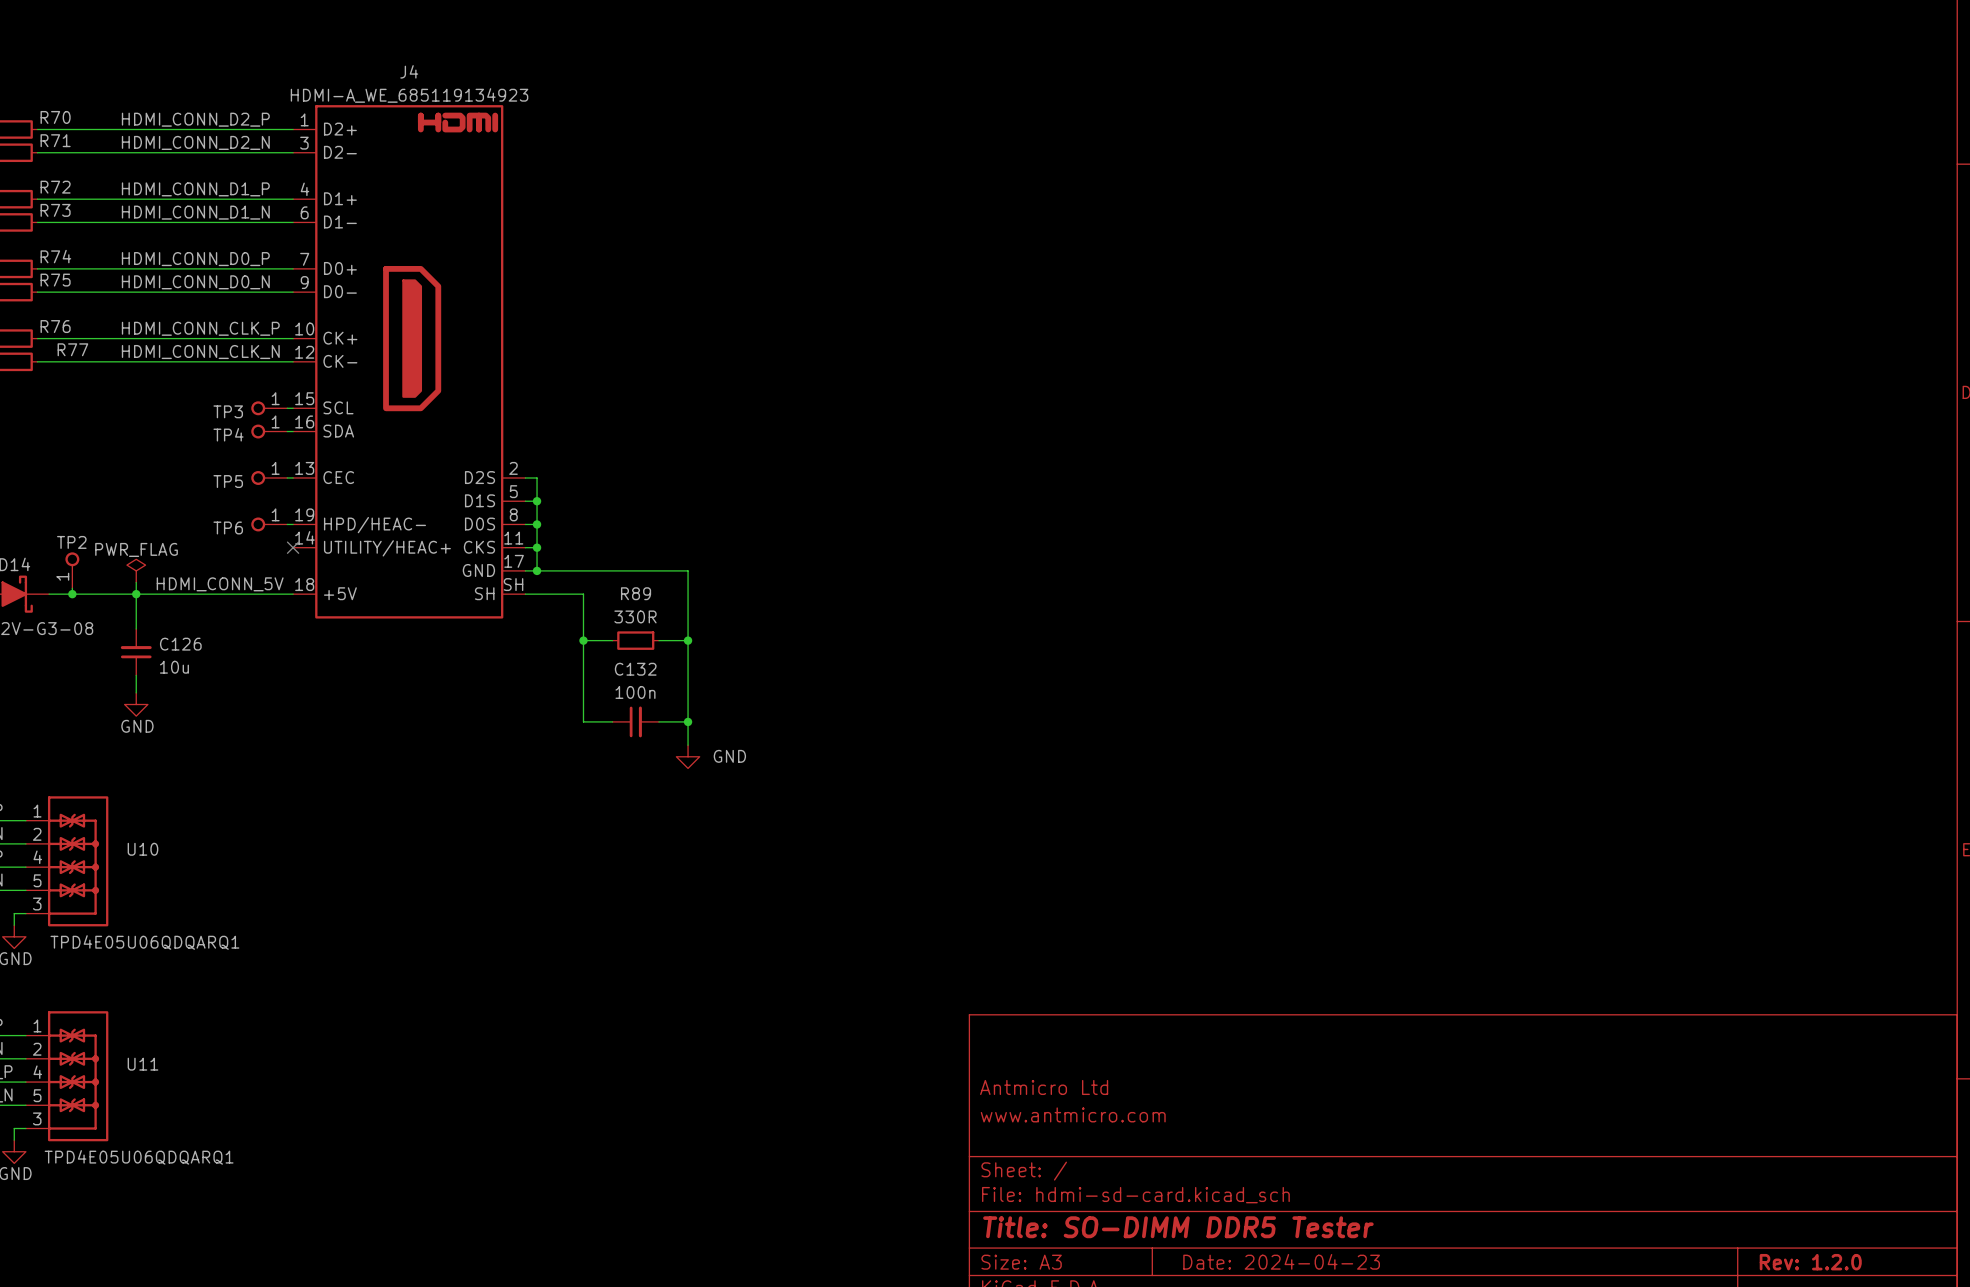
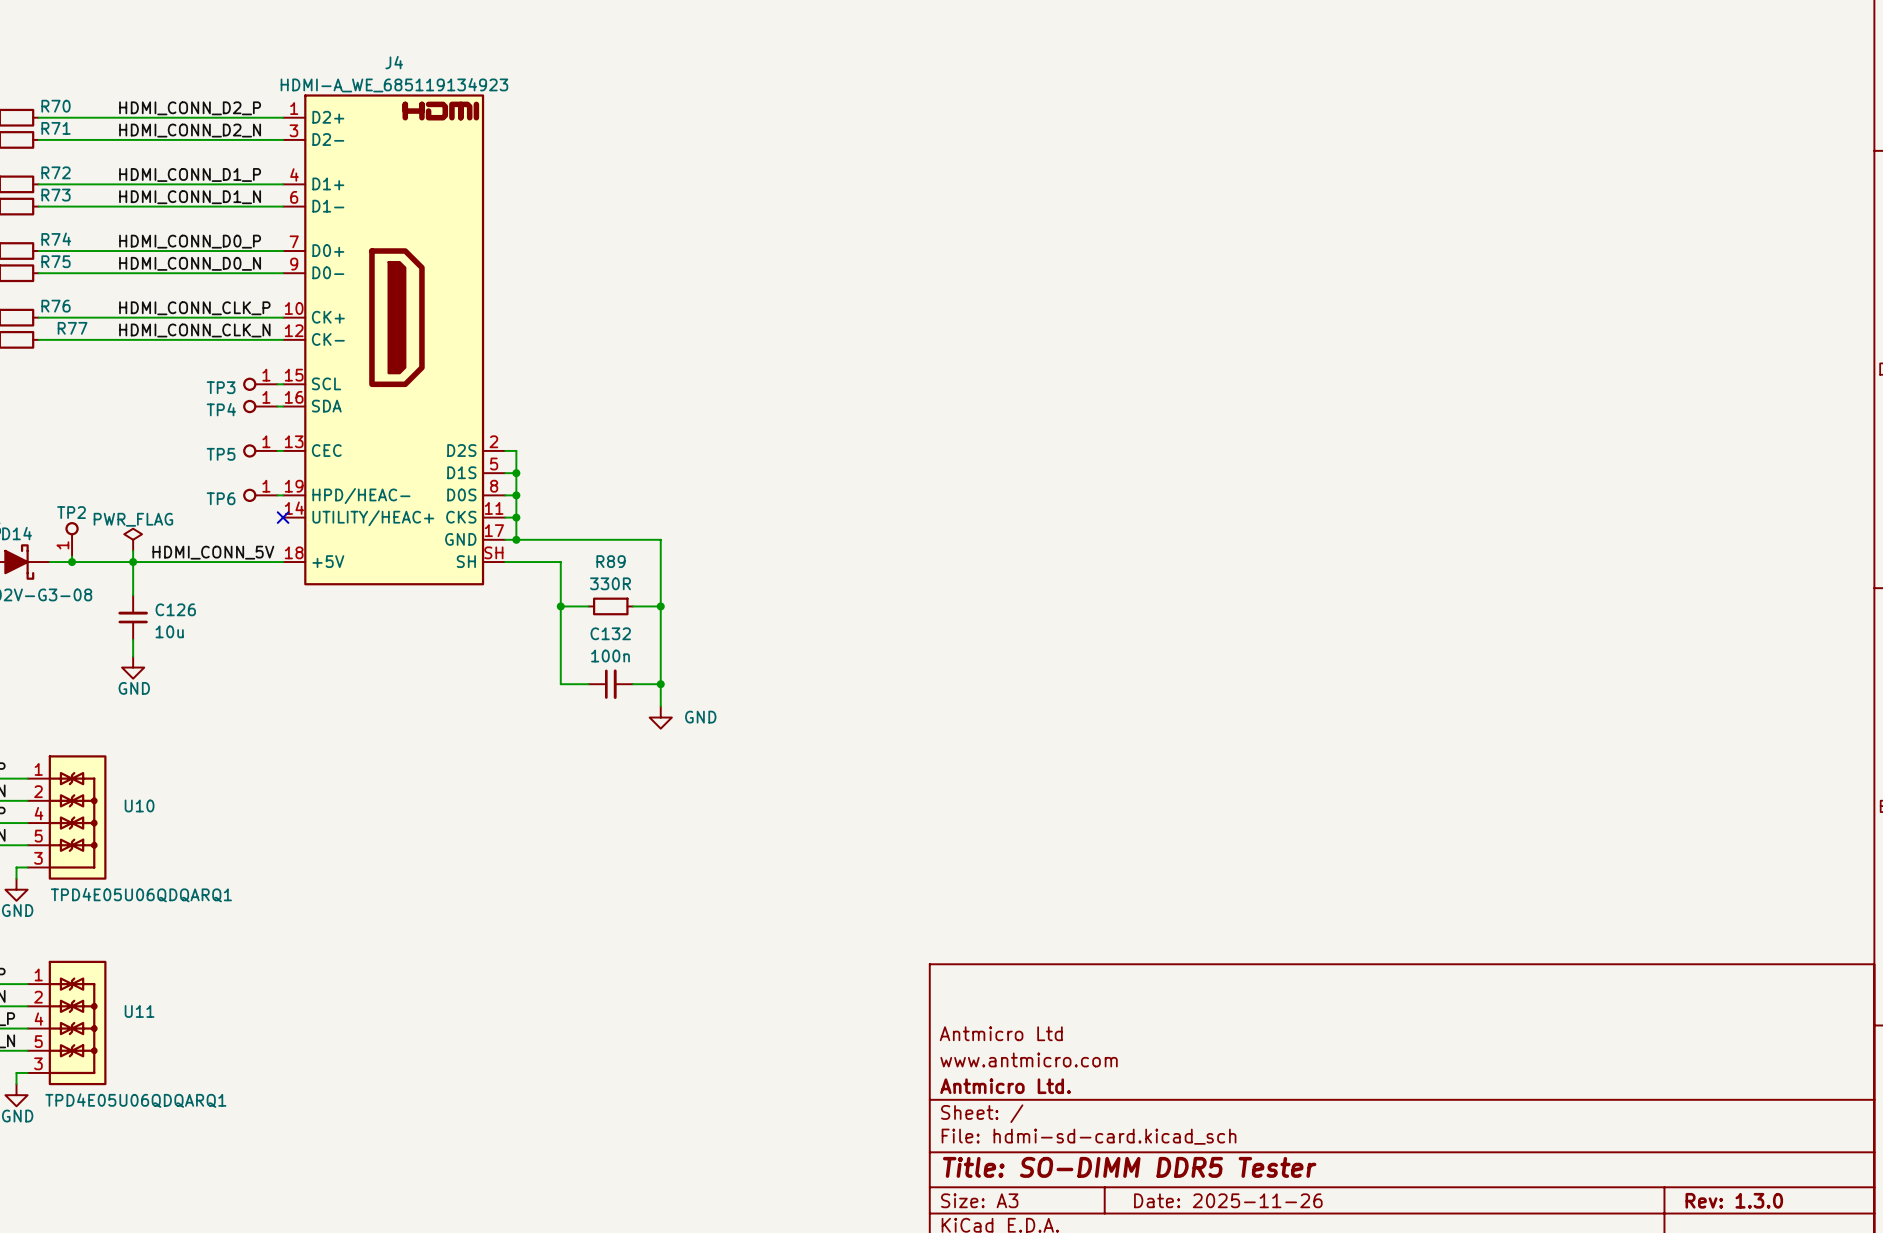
title block: none -> Antmicro Ltd. (1005, 1086)
title block: Date: 2024-04-23 (1281, 1261) -> Date: 2025-11-26 (1228, 1200)
title block: Rev: 1.2.0 (1810, 1262) -> Rev: 1.3.0 (1734, 1200)

